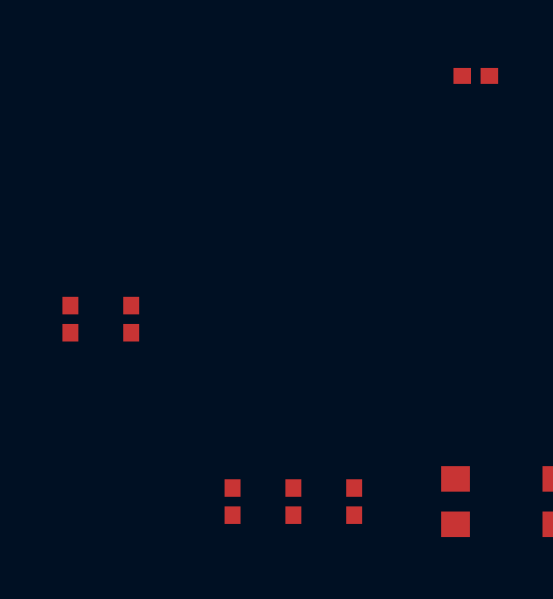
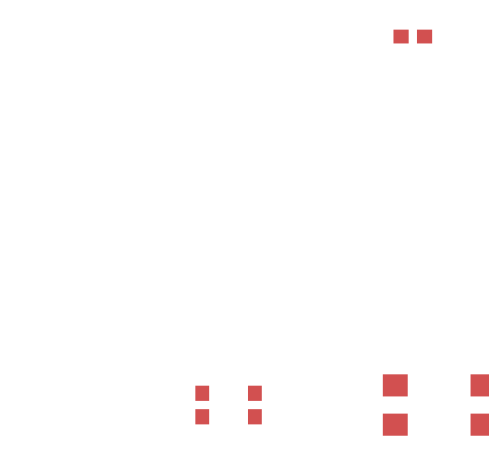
part: (70, 319) -> none
part: (131, 319) -> none
part: (354, 501) -> none

